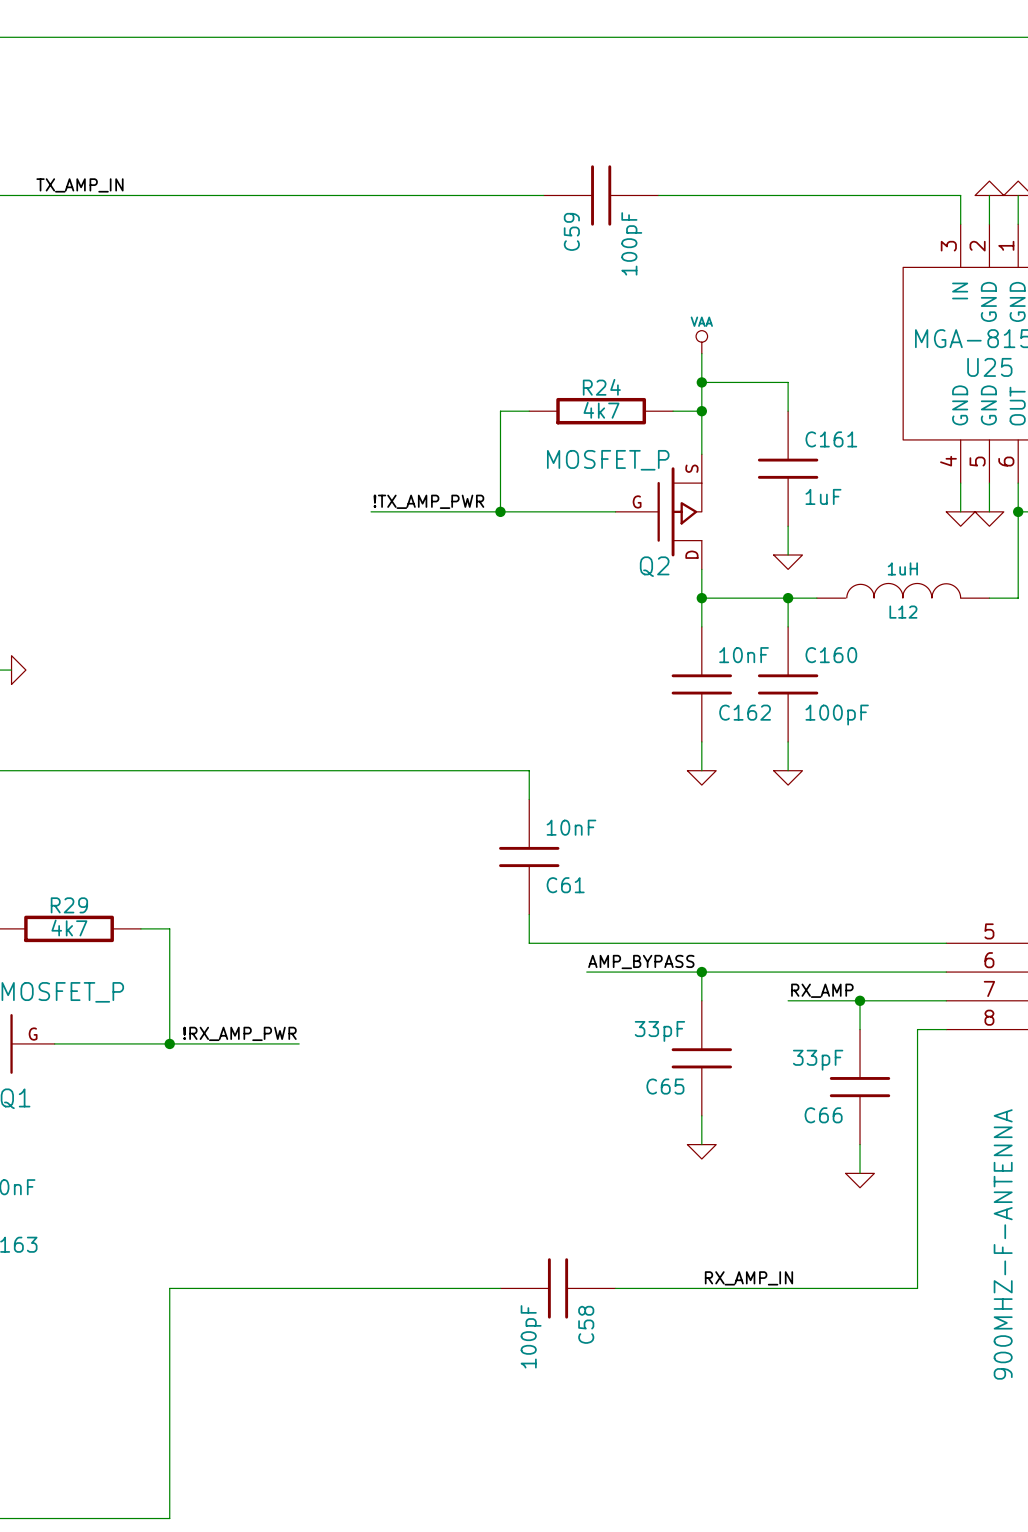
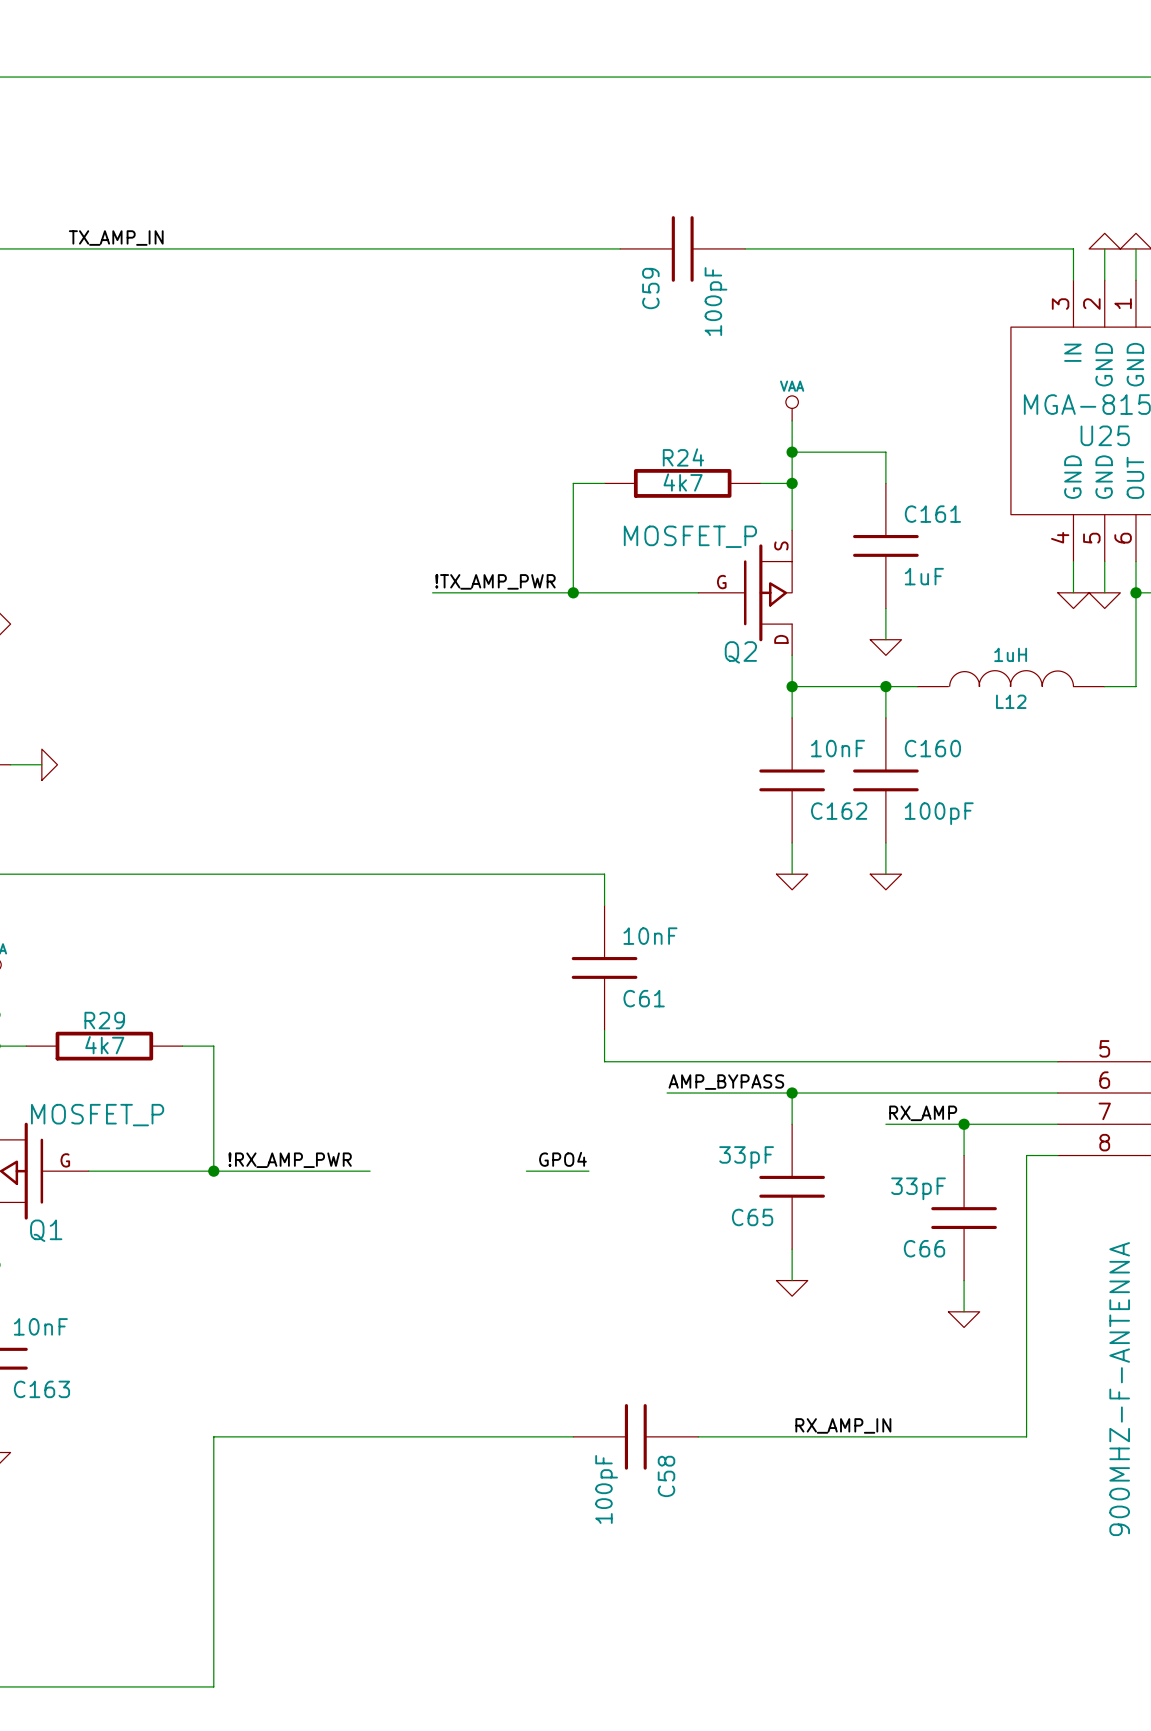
label: none -> GPO4 (562, 1159)
wire: none -> (354, 1171) (370, 1171)
wire: none -> (526, 1171) (588, 1171)

